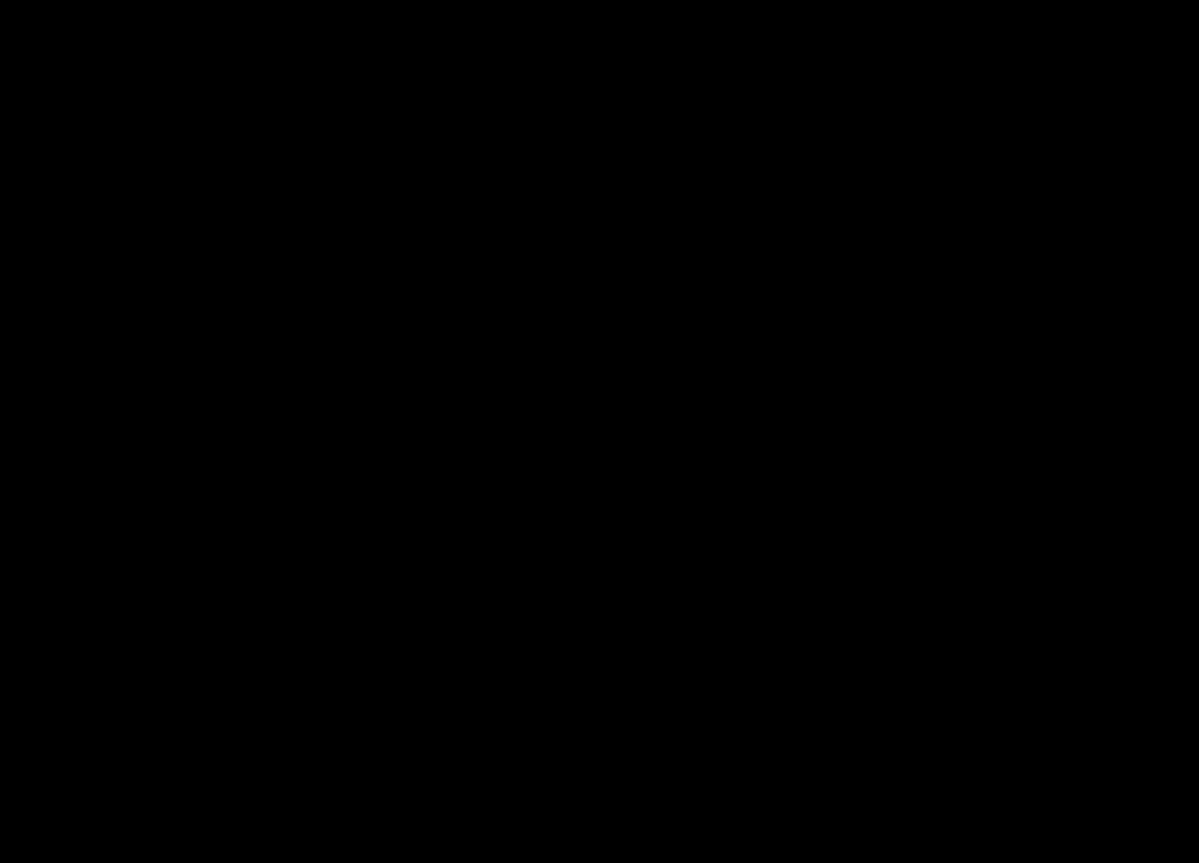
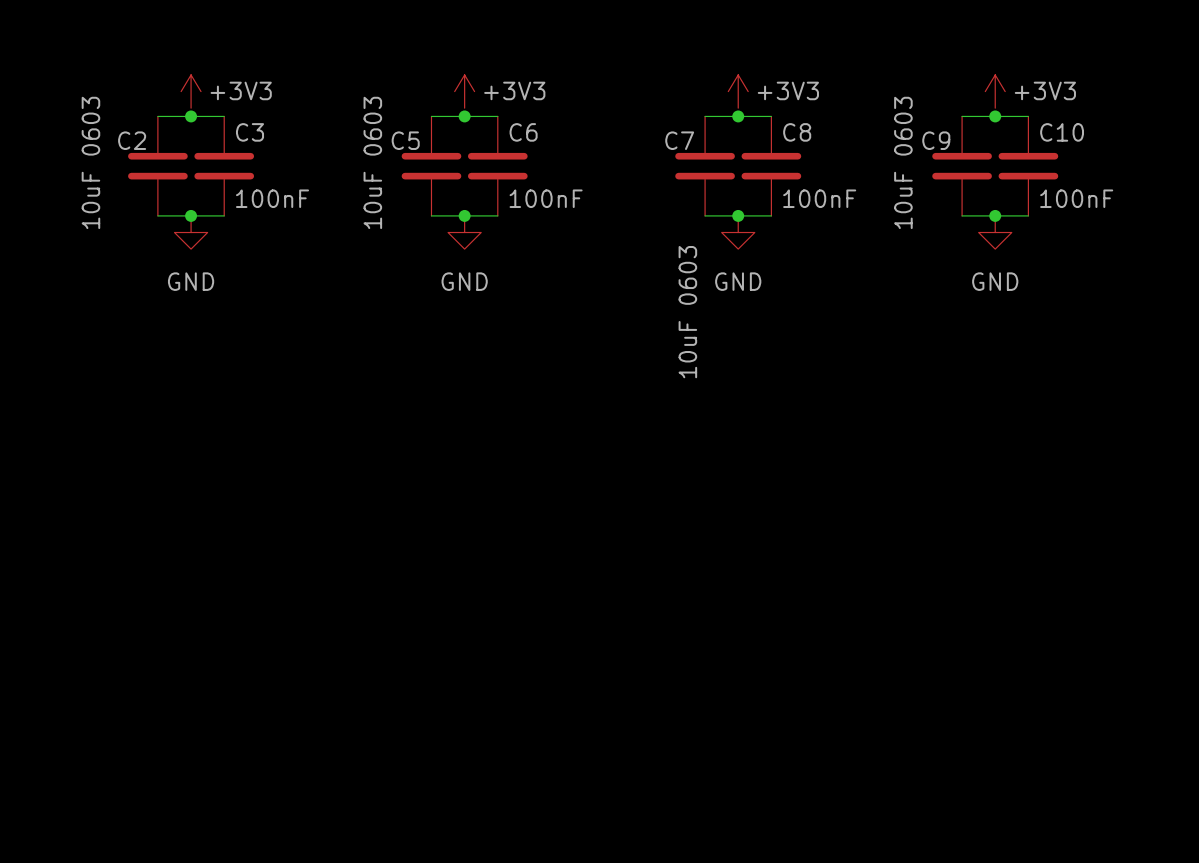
power symbol: none -> +3V3 (191, 91)
power symbol: none -> +3V3 (464, 91)
power symbol: none -> +3V3 (738, 91)
power symbol: none -> +3V3 (995, 91)
wire: none -> (157, 116) (224, 116)
junction: none -> (191, 116)
wire: none -> (431, 116) (497, 116)
junction: none -> (464, 116)
wire: none -> (705, 116) (771, 116)
junction: none -> (738, 116)
wire: none -> (962, 116) (1028, 116)
junction: none -> (995, 116)
C2: none -> 10uF 0603 (157, 166)
C3: none -> 100nF (224, 166)
C5: none -> 10uF 0603 (431, 166)
C6: none -> 100nF (497, 166)
C7: none -> 10uF 0603 (705, 166)
C8: none -> 100nF (771, 166)
C9: none -> 10uF 0603 (962, 166)
C10: none -> 100nF (1028, 166)
wire: none -> (157, 215) (224, 215)
junction: none -> (191, 215)
wire: none -> (431, 215) (497, 215)
junction: none -> (464, 215)
wire: none -> (705, 215) (771, 215)
junction: none -> (738, 215)
wire: none -> (962, 215) (1028, 215)
junction: none -> (995, 215)
power symbol: none -> GND (191, 232)
power symbol: none -> GND (464, 232)
power symbol: none -> GND (738, 232)
power symbol: none -> GND (995, 232)

